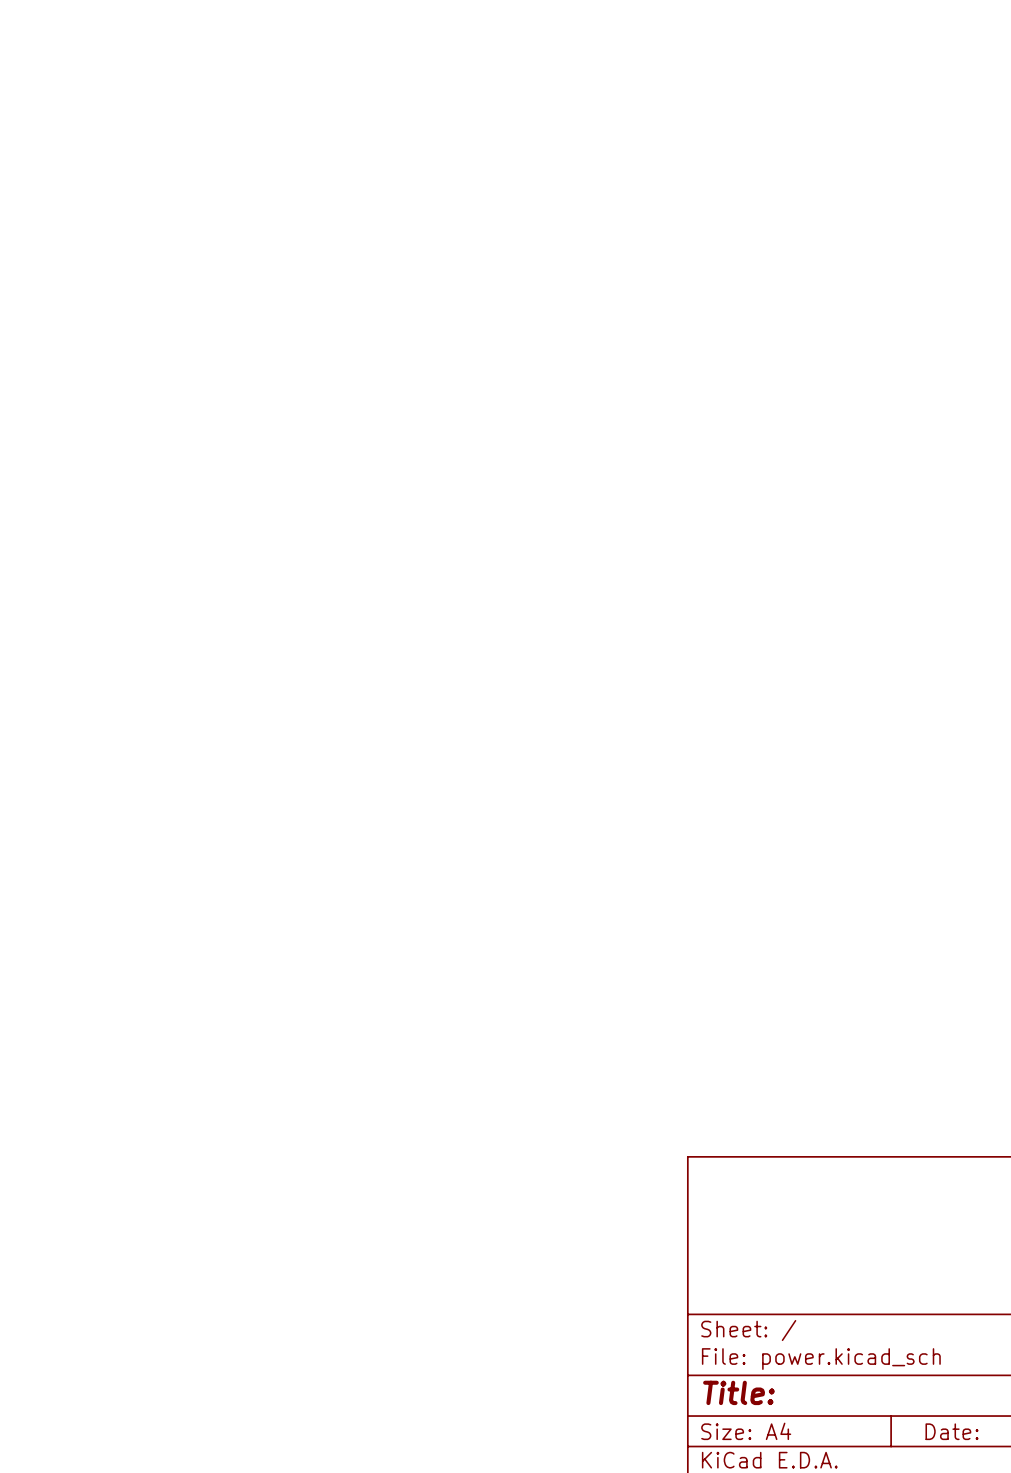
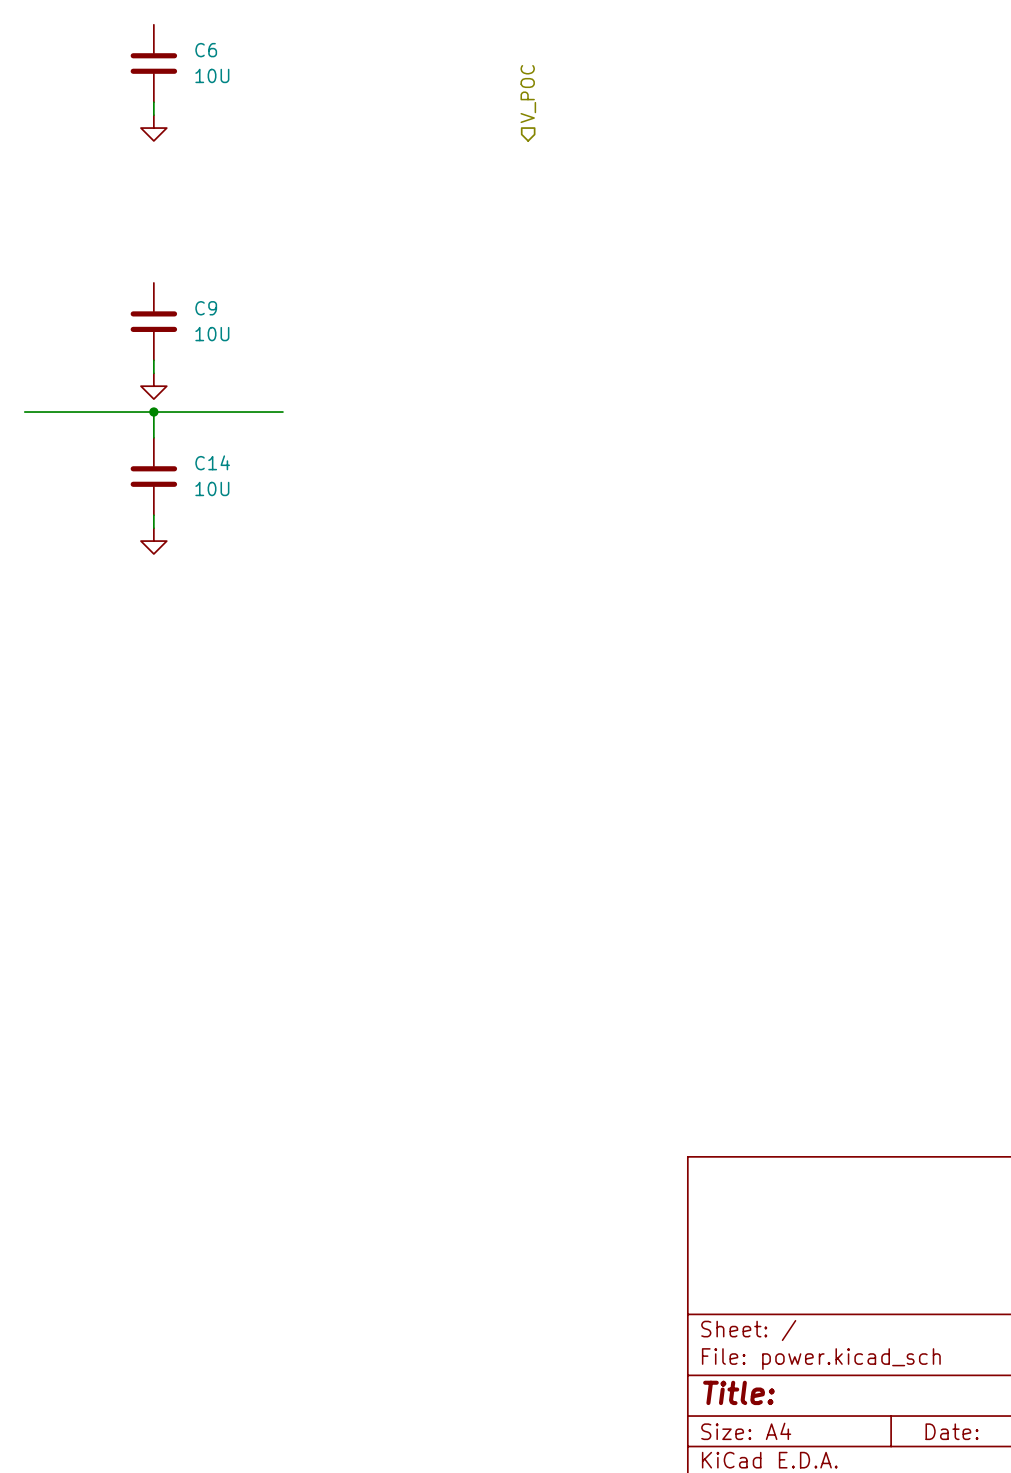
C6: none -> 10U (153, 63)
hierarchical label: none -> V_POC (528, 94)
wire: none -> (153, 102) (153, 115)
power symbol: none -> (153, 128)
C9: none -> 10U (153, 321)
wire: none -> (153, 360) (153, 373)
power symbol: none -> (153, 386)
wire: none -> (24, 412) (282, 412)
wire: none -> (153, 412) (153, 437)
junction: none -> (153, 412)
C14: none -> 10U (153, 476)
wire: none -> (153, 515) (153, 528)
power symbol: none -> (153, 541)

